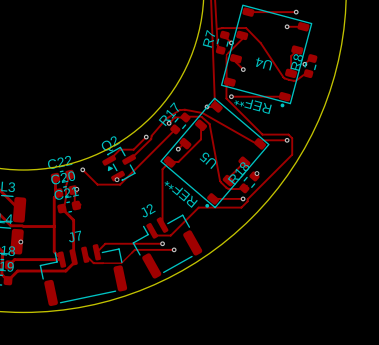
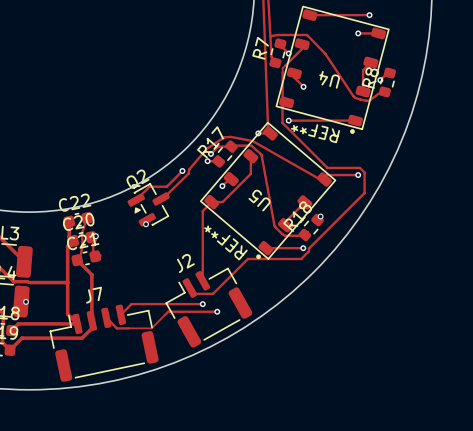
track: none -> (207, 161) (212, 161)
via: none -> (207, 161)
track: (175, 129) (120, 184) (97, 184) (82, 169) -> none
via: (82, 169) -> none

